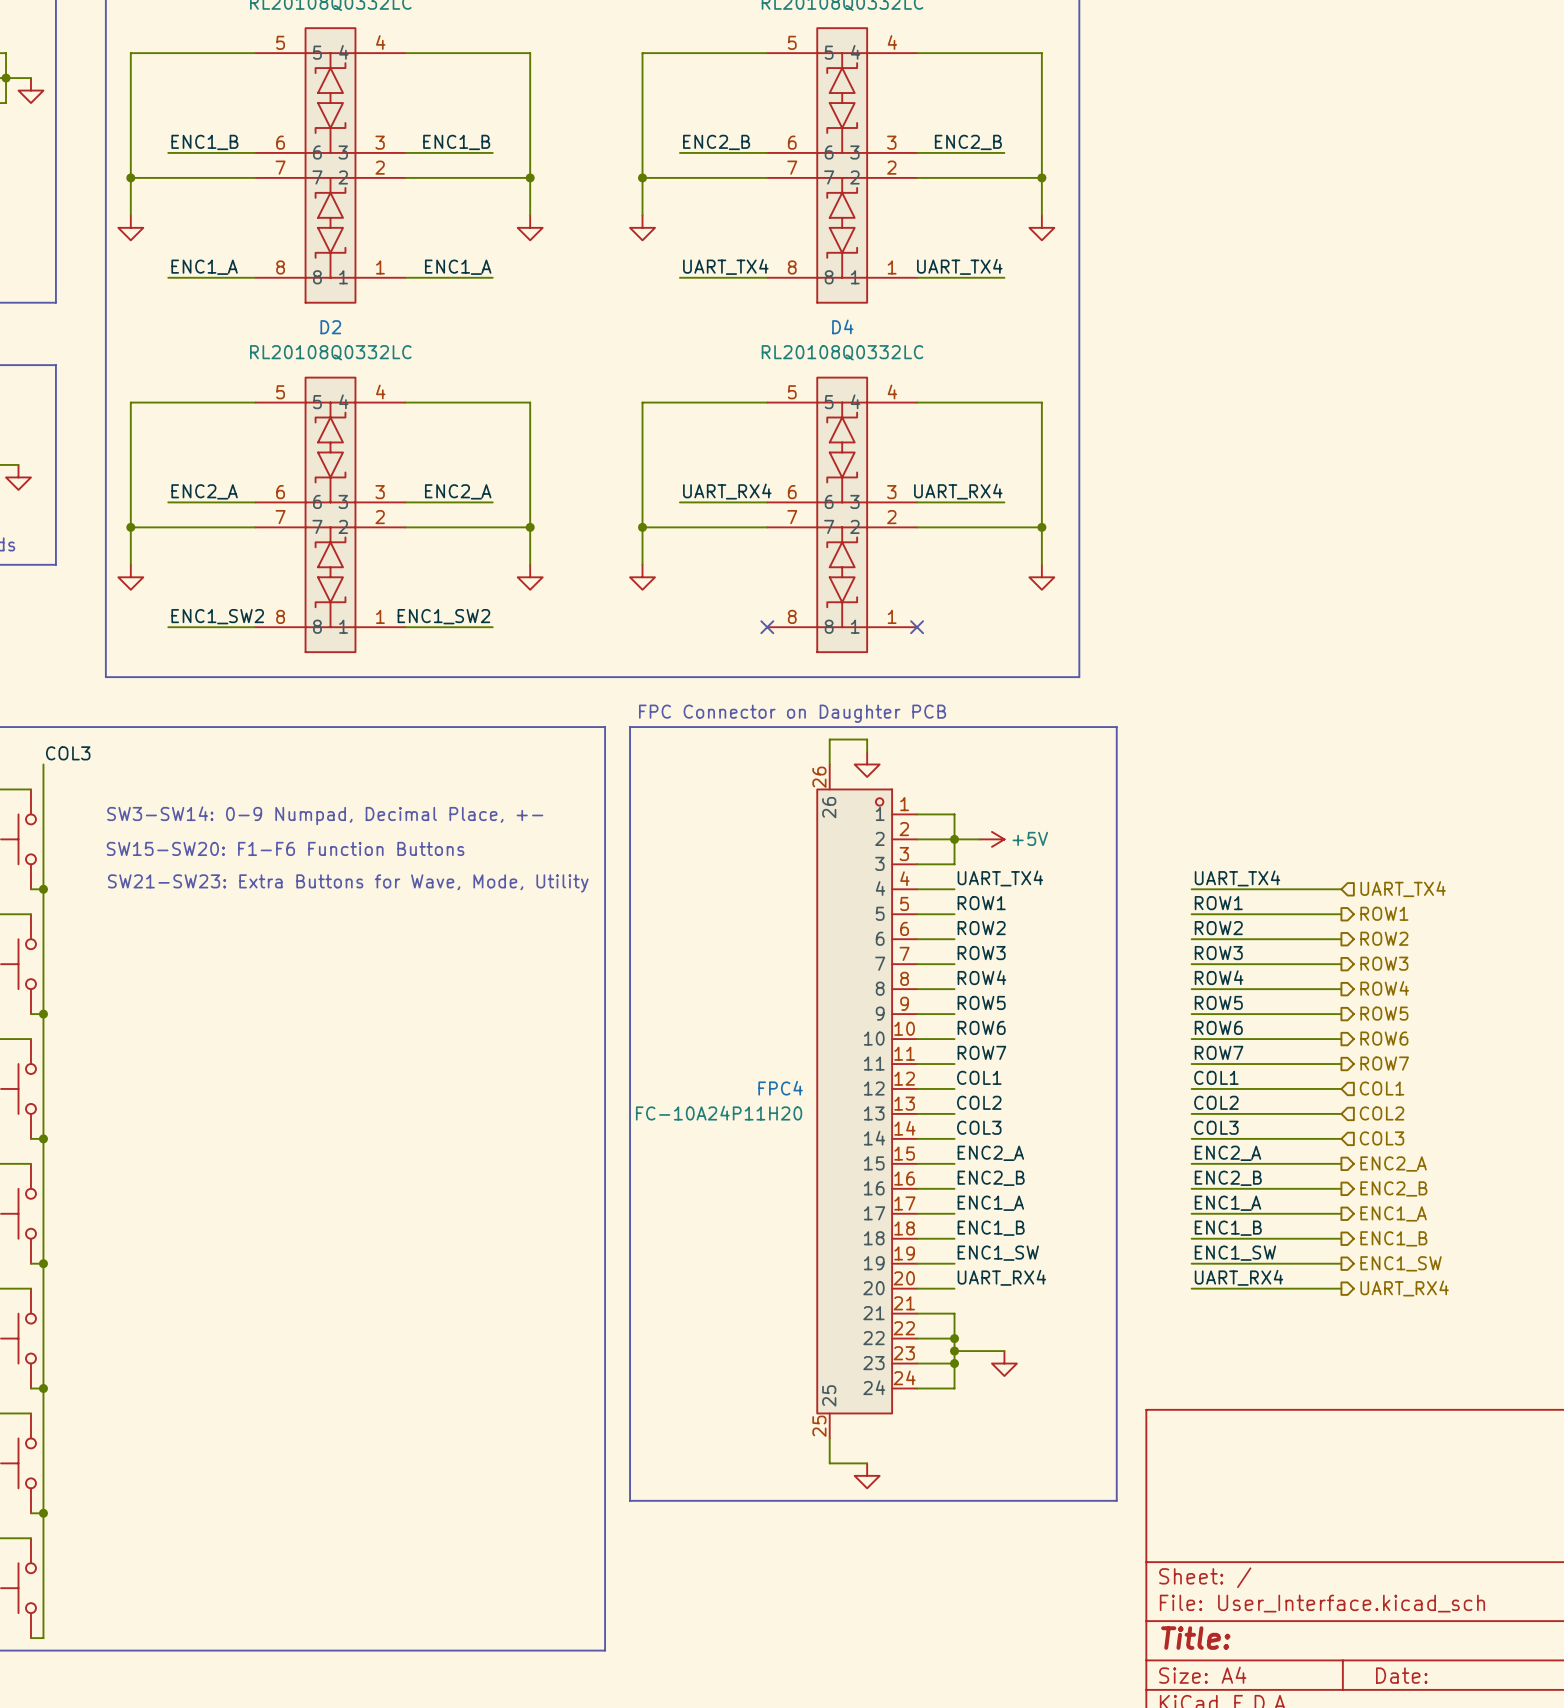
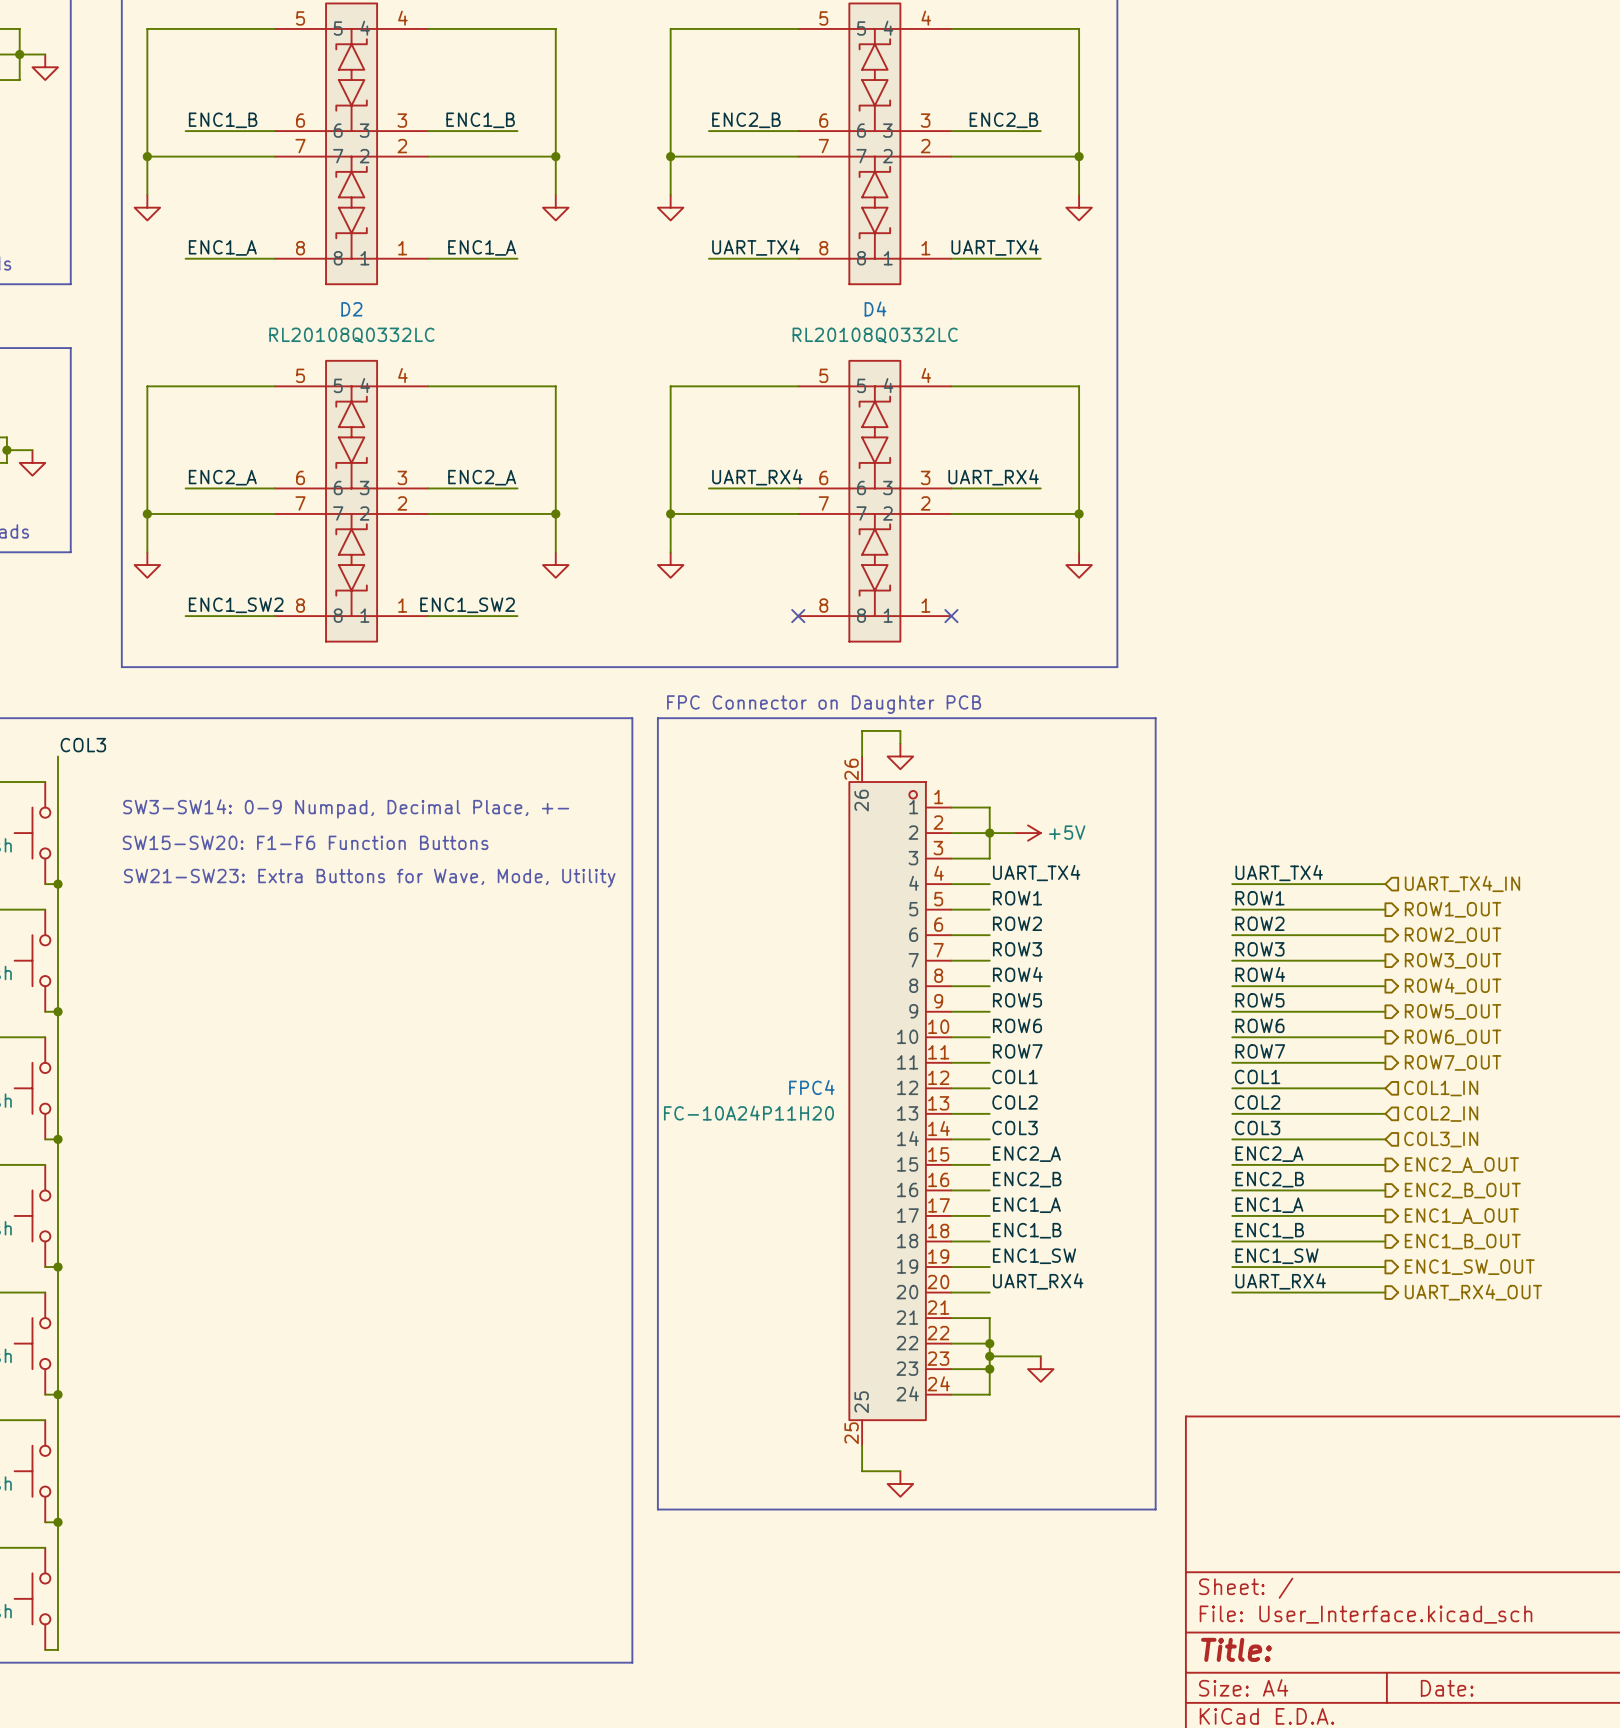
hierarchical label: UART_TX4 (1403, 889) -> UART_TX4_IN (1462, 883)
hierarchical label: ROW1 (1384, 913) -> ROW1_OUT (1453, 909)
hierarchical label: ROW2 (1384, 938) -> ROW2_OUT (1453, 935)
hierarchical label: ROW3 (1384, 963) -> ROW3_OUT (1453, 960)
hierarchical label: ROW4 (1384, 988) -> ROW4_OUT (1453, 986)
hierarchical label: ROW5 (1384, 1013) -> ROW5_OUT (1453, 1011)
hierarchical label: ROW6 (1384, 1038) -> ROW6_OUT (1453, 1037)
hierarchical label: ROW7 (1384, 1063) -> ROW7_OUT (1453, 1062)
hierarchical label: COL1 (1382, 1088) -> COL1_IN (1441, 1088)
hierarchical label: COL2 (1382, 1113) -> COL2_IN (1441, 1113)
hierarchical label: COL3 (1382, 1138) -> COL3_IN (1441, 1139)
hierarchical label: ENC2_A (1393, 1163) -> ENC2_A_OUT (1461, 1165)
hierarchical label: ENC2_B (1393, 1188) -> ENC2_B_OUT (1462, 1190)
hierarchical label: ENC1_A (1393, 1213) -> ENC1_A_OUT (1461, 1216)
hierarchical label: ENC1_B (1393, 1238) -> ENC1_B_OUT (1462, 1241)
hierarchical label: ENC1_SW (1401, 1263) -> ENC1_SW_OUT (1469, 1267)
hierarchical label: UART_RX4 (1404, 1288) -> UART_RX4_OUT (1473, 1292)

